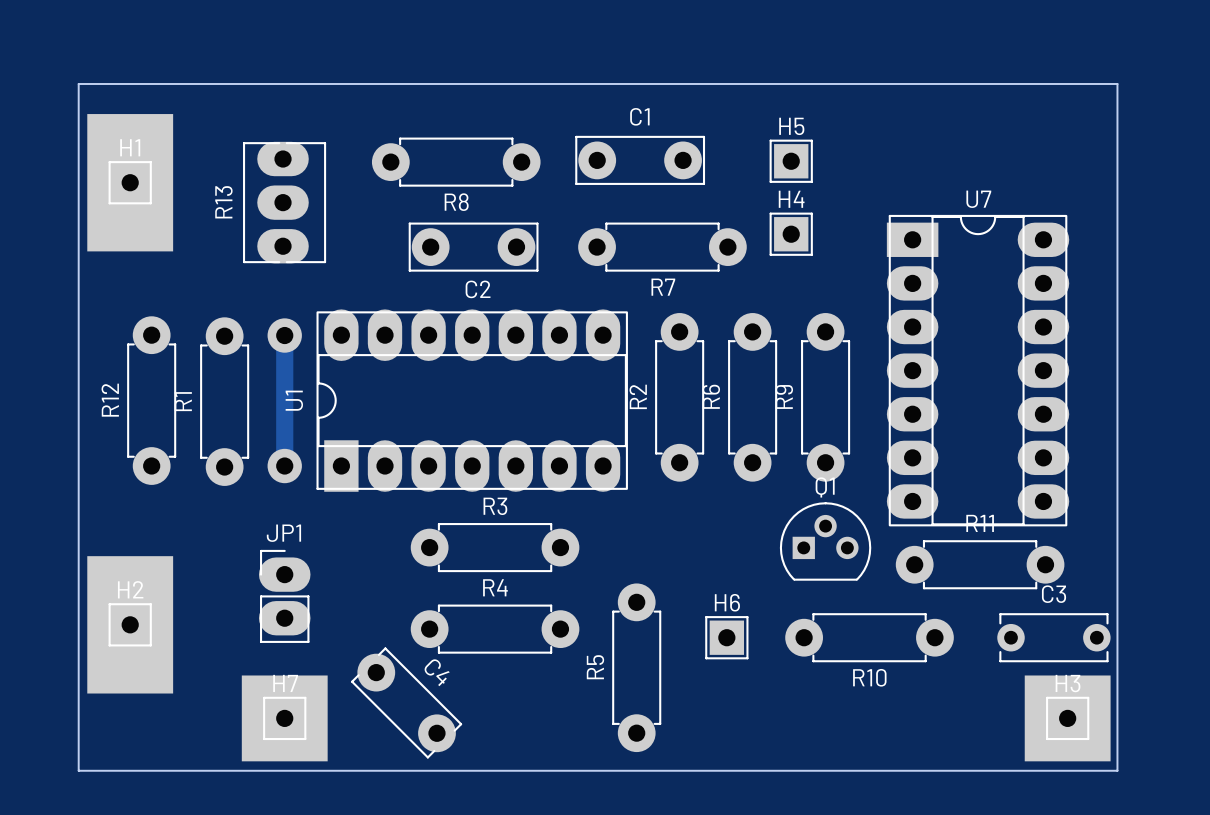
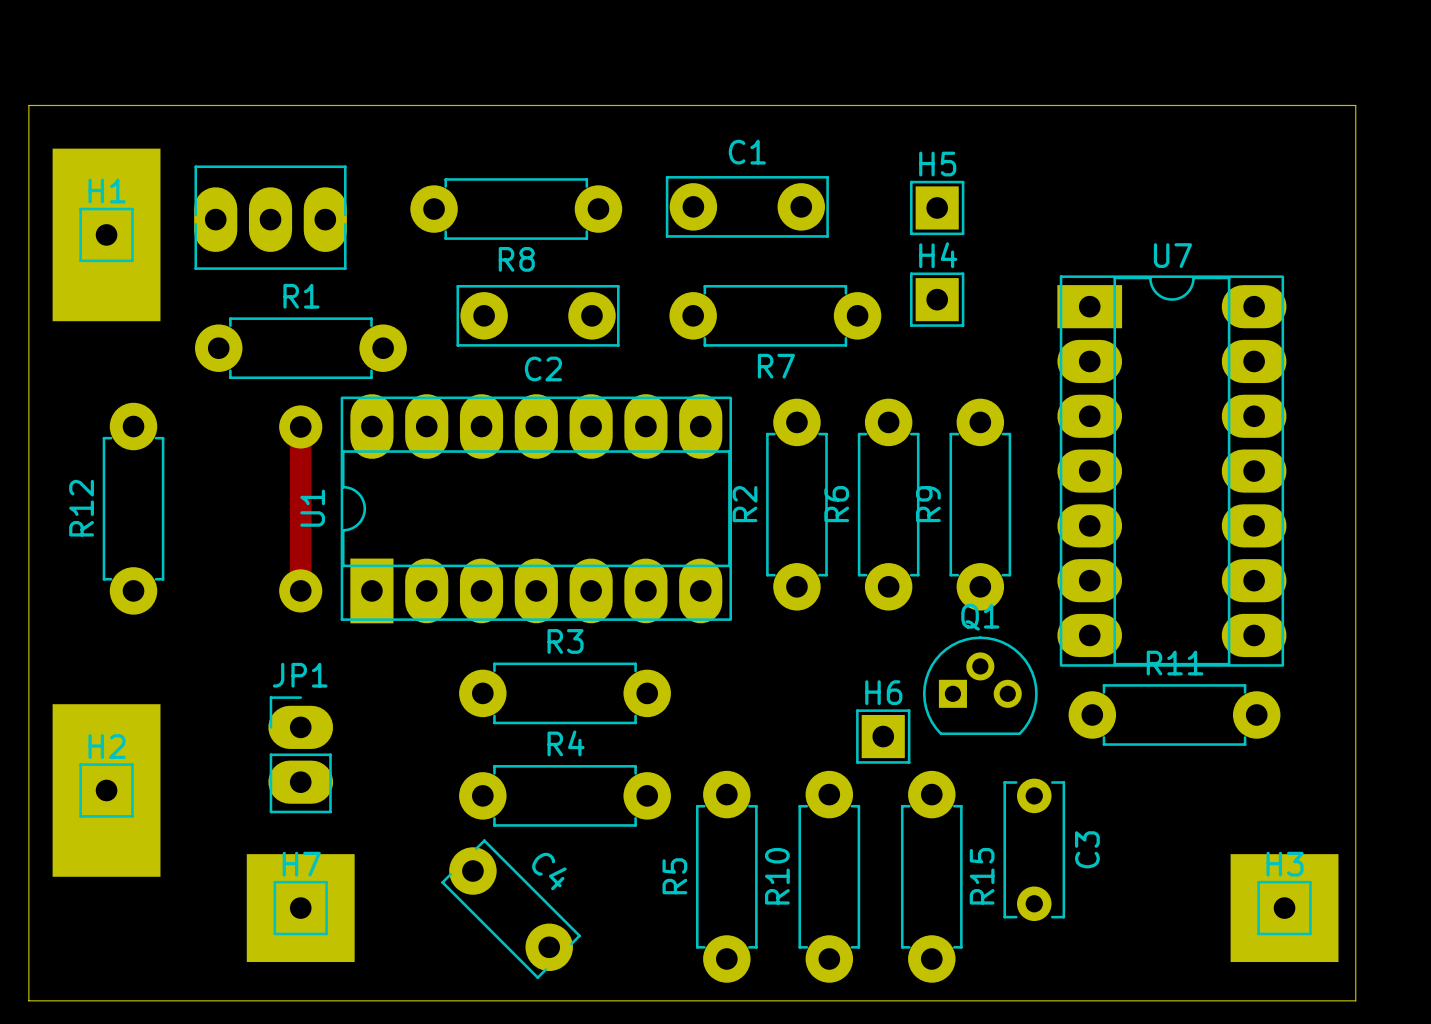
board edge: (78, 83) (1117, 83) (1117, 770) (78, 770) (78, 83) -> (28, 105) (28, 1000) (1355, 1000) (1355, 105) (28, 105)
part: none -> (270, 217)
R13: (284, 202) -> none
R1 rotation: 0° (224, 401) -> 90° clockwise (300, 348)
R1 position: (224, 401) -> (300, 348)
H6 position: (726, 637) -> (883, 736)
R10 rotation: 0° (869, 637) -> 90° clockwise (829, 876)
R10 position: (869, 637) -> (829, 876)
C3 rotation: 0° (1053, 637) -> 90° clockwise (1034, 849)
C3 position: (1053, 637) -> (1034, 849)
R5 position: (636, 667) -> (726, 876)
R15: none -> (931, 876)
C4 position: (406, 702) -> (511, 909)

